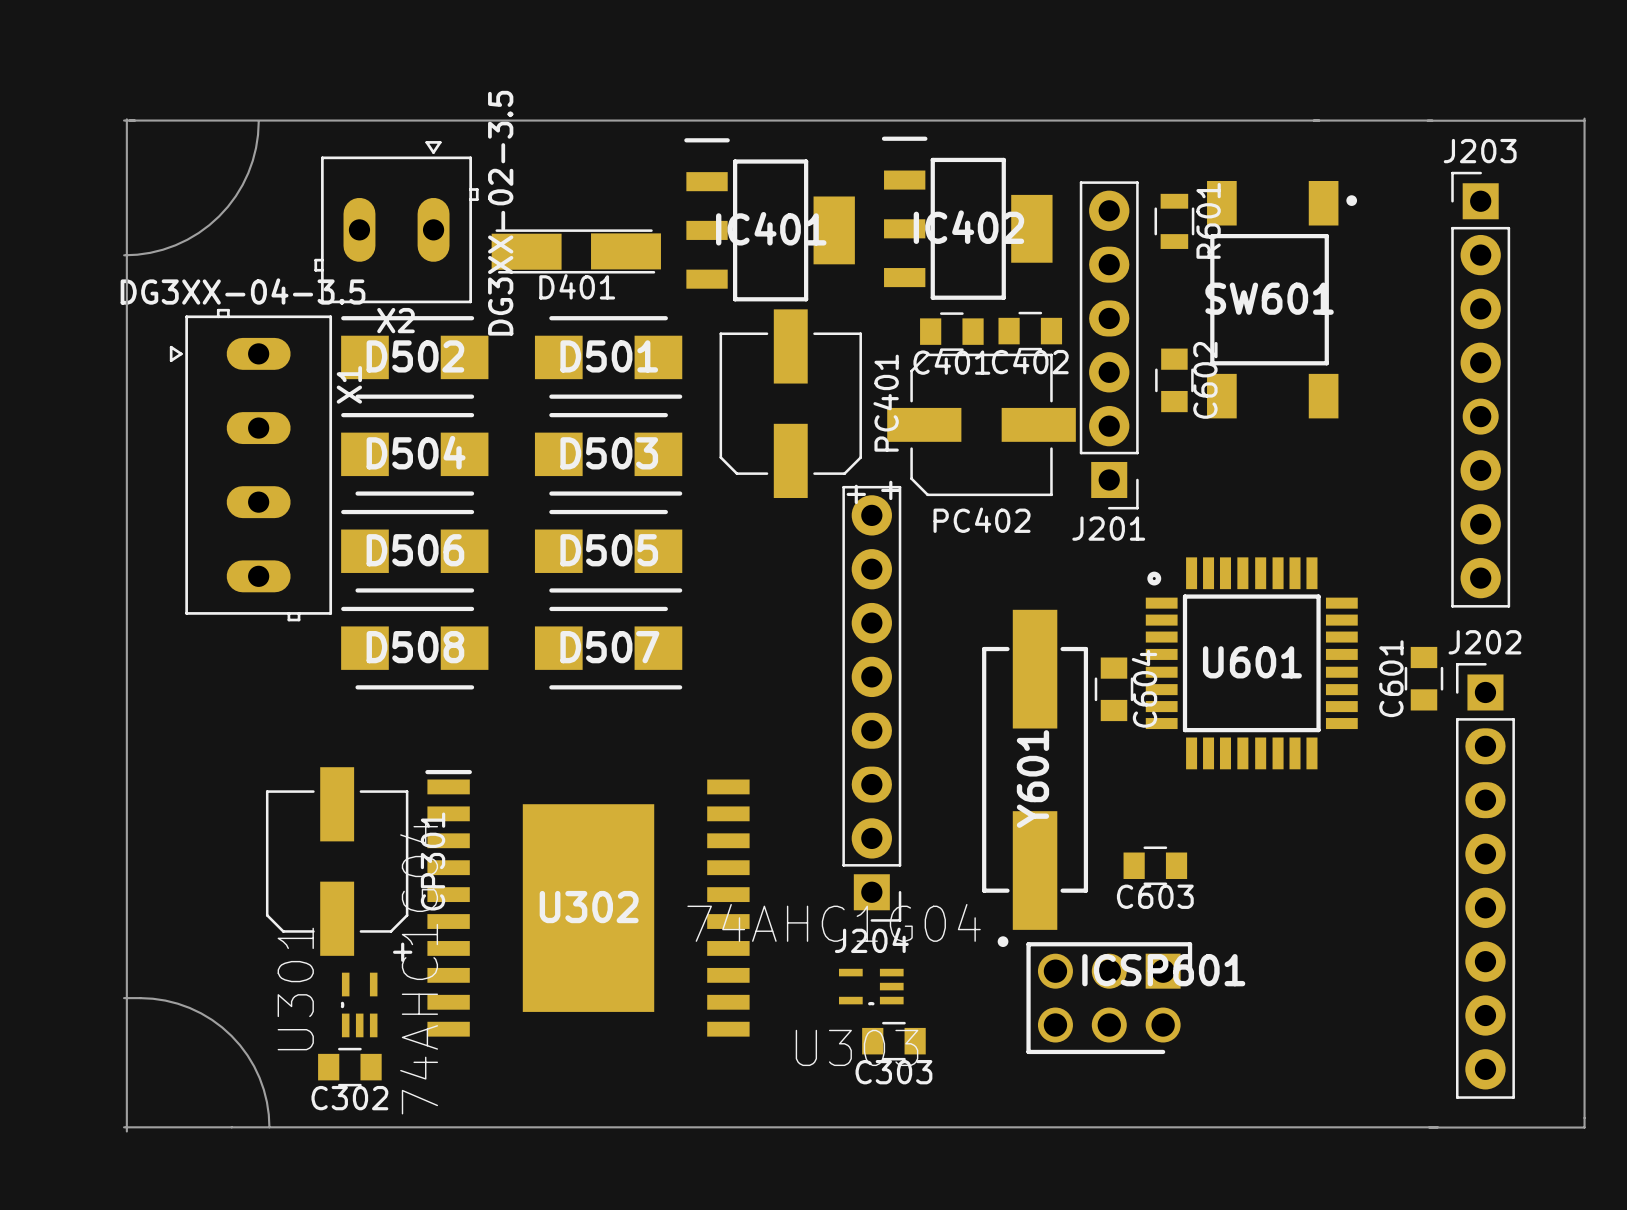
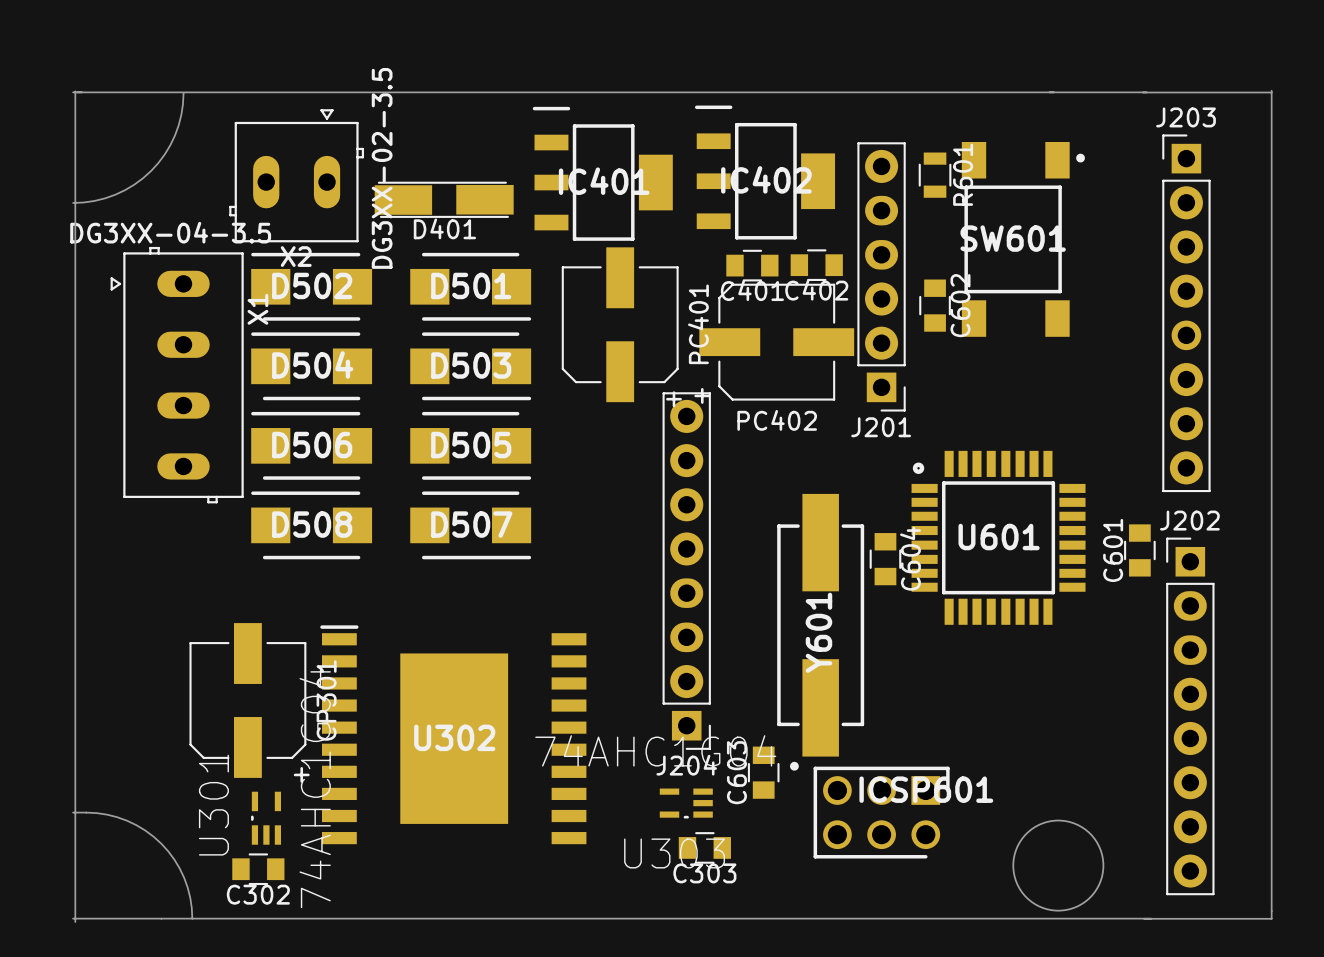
C603 rotation: 0° (1155, 865) -> 90° clockwise (763, 772)
C603 position: (1155, 865) -> (763, 772)
round board edge: none -> [1012, 819, 1105, 912]

